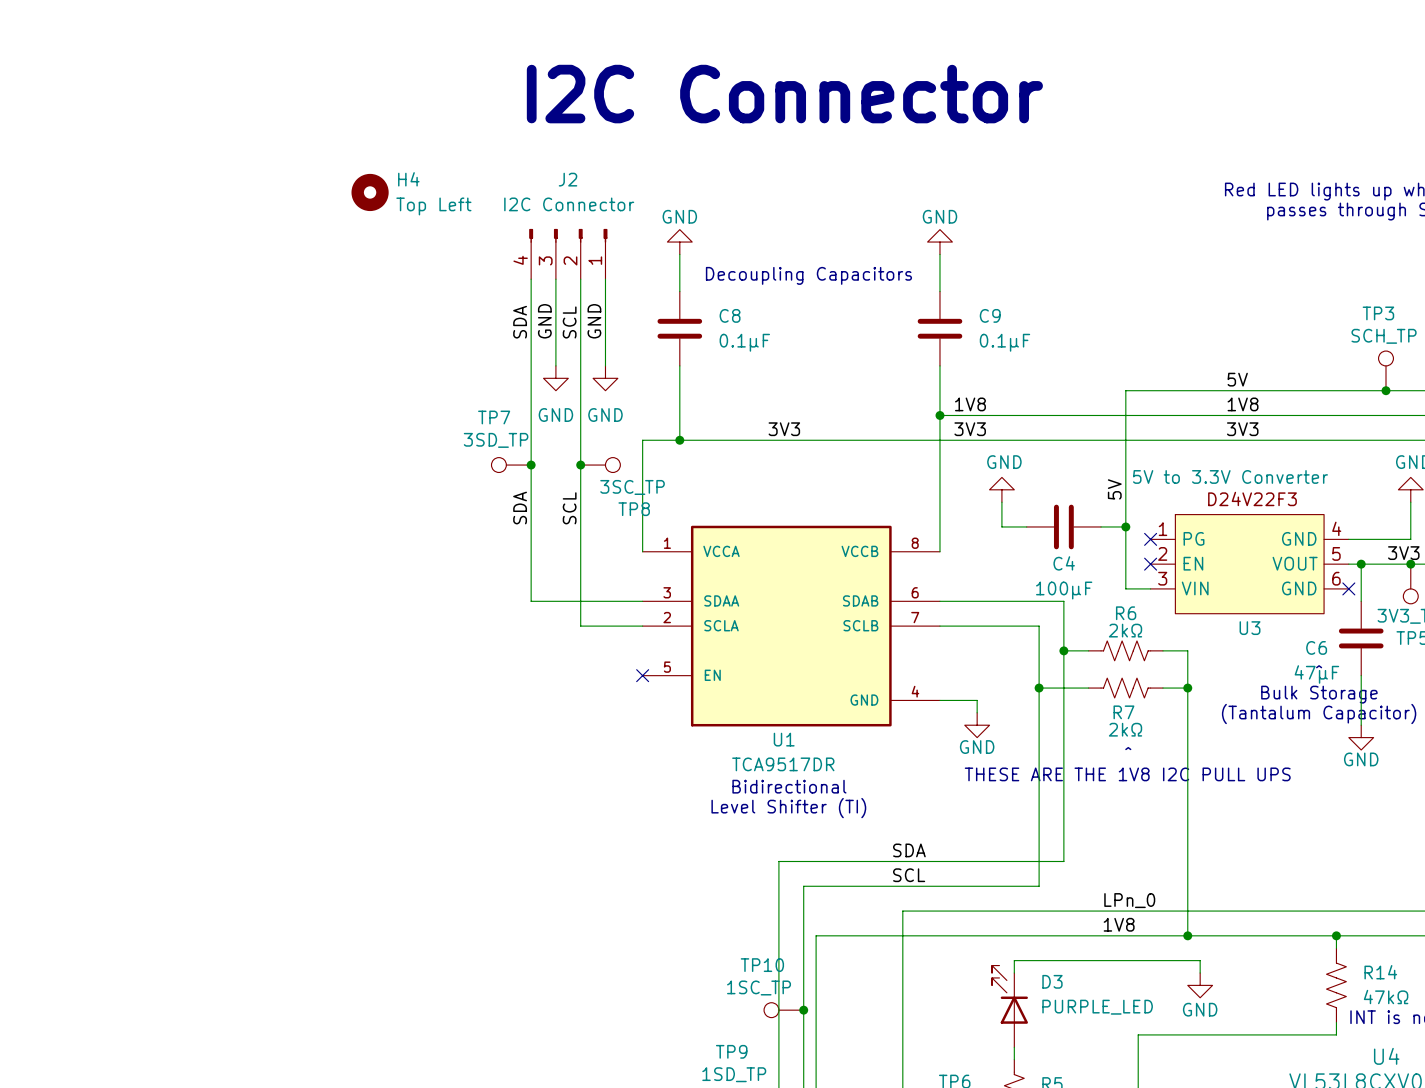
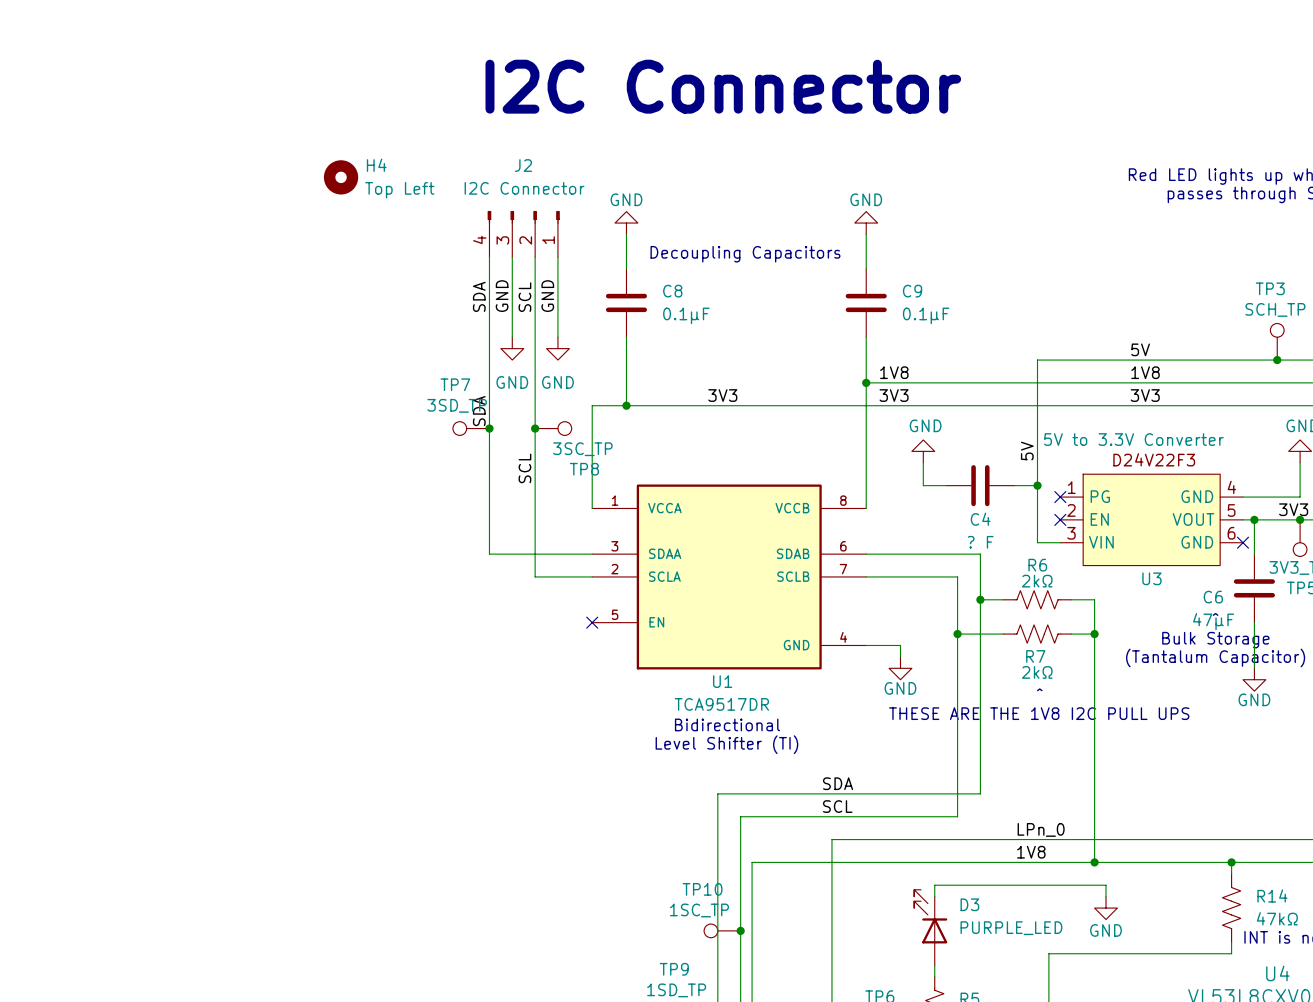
label position: SDA (520, 508) -> SDA (479, 411)
C4 value: 100μF (1064, 590) -> ? F (980, 542)

